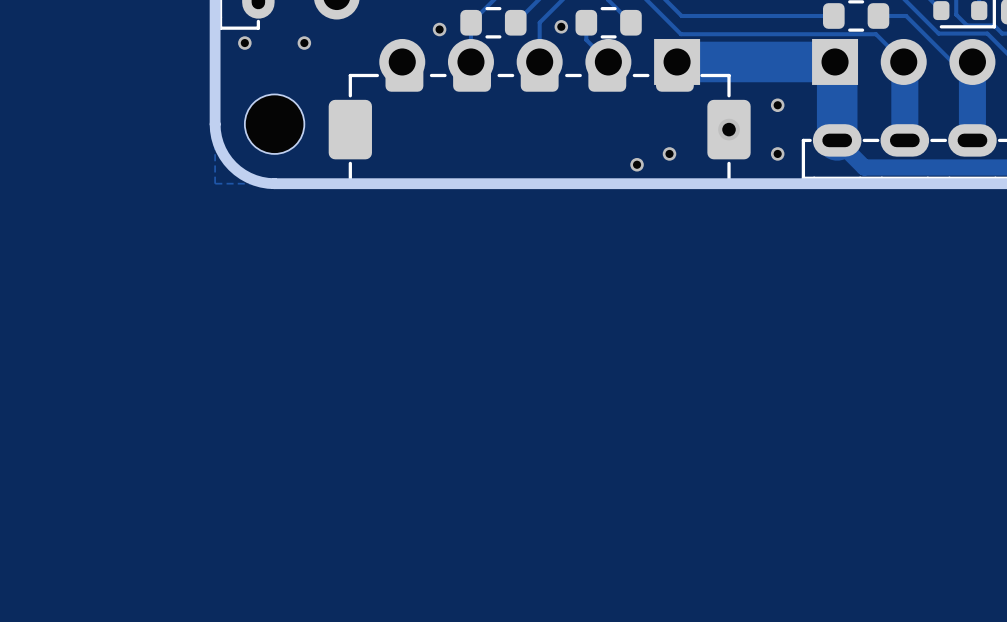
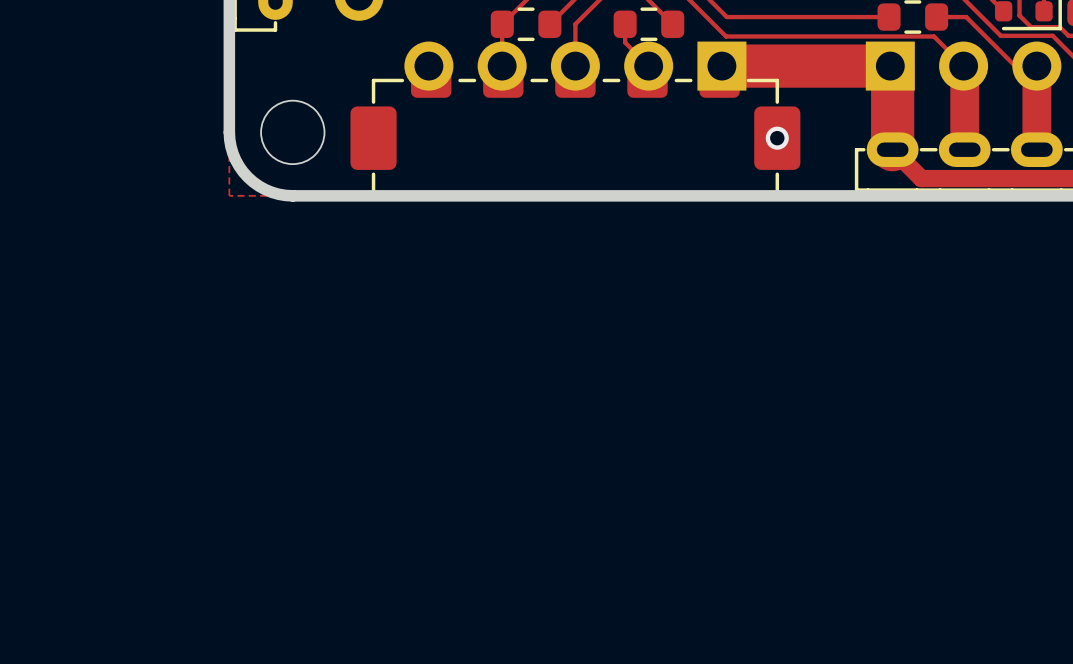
via: (561, 26) -> none
via: (439, 29) -> none
via: (244, 43) -> none
via: (304, 43) -> none
via: (777, 105) -> none
via: (669, 153) -> none
via: (777, 153) -> none
via: (637, 164) -> none

